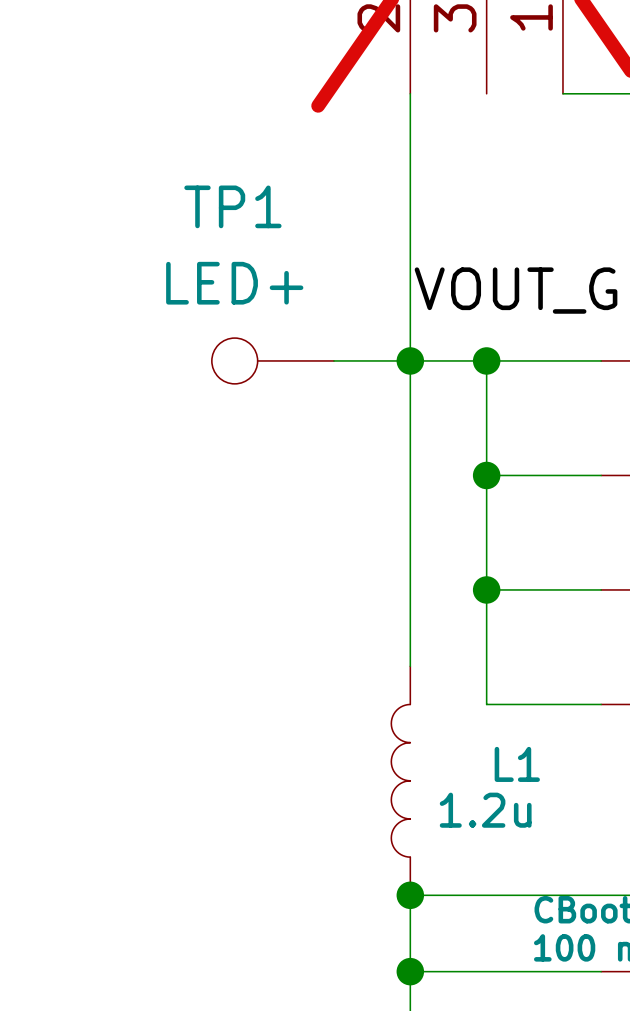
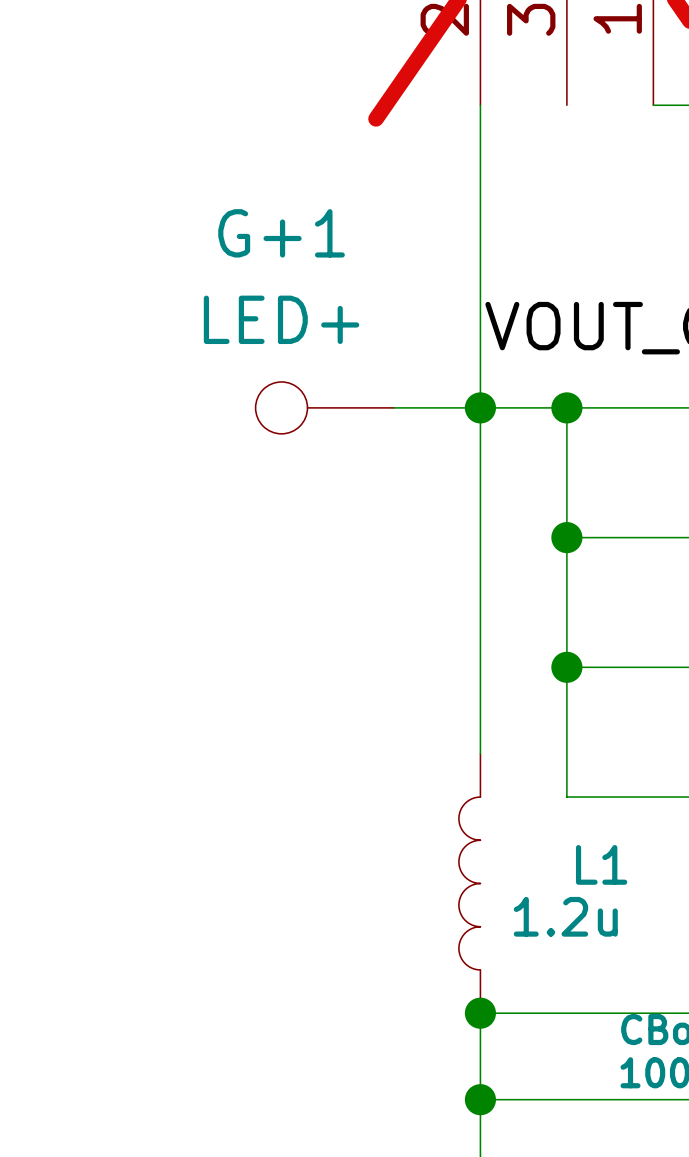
TP1 name: TP1 (232, 206) -> G+1 (281, 233)

